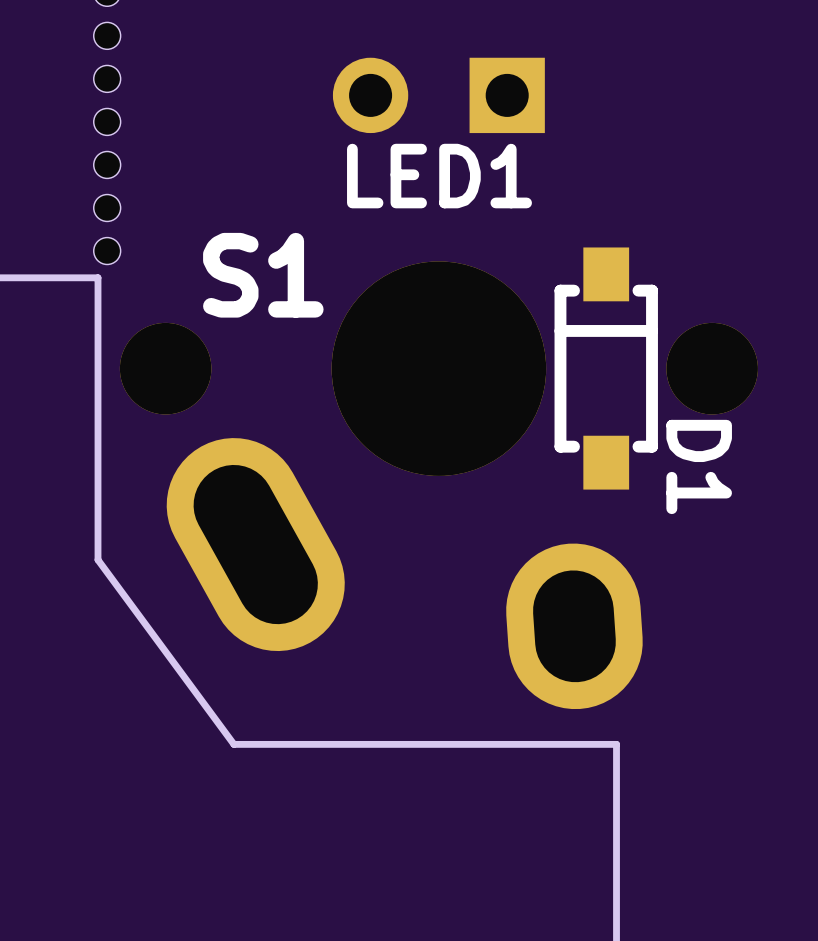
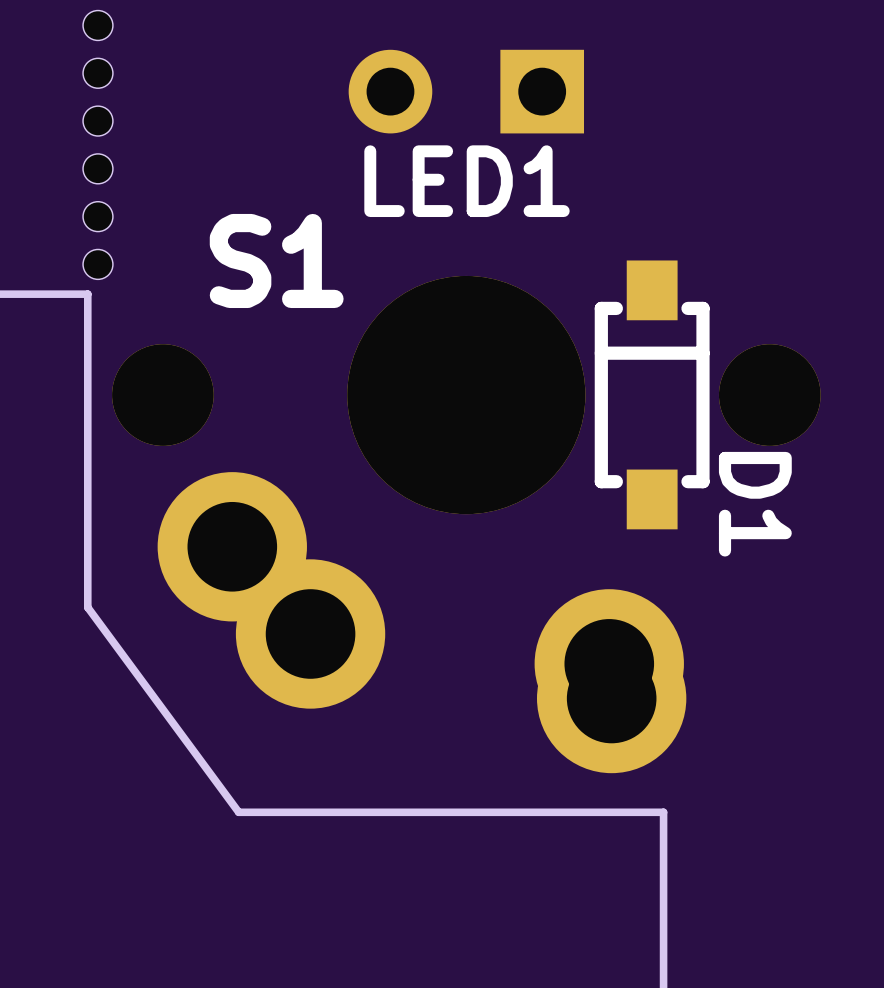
S1 footprint: [119, 261, 758, 710] -> [112, 275, 821, 774]

